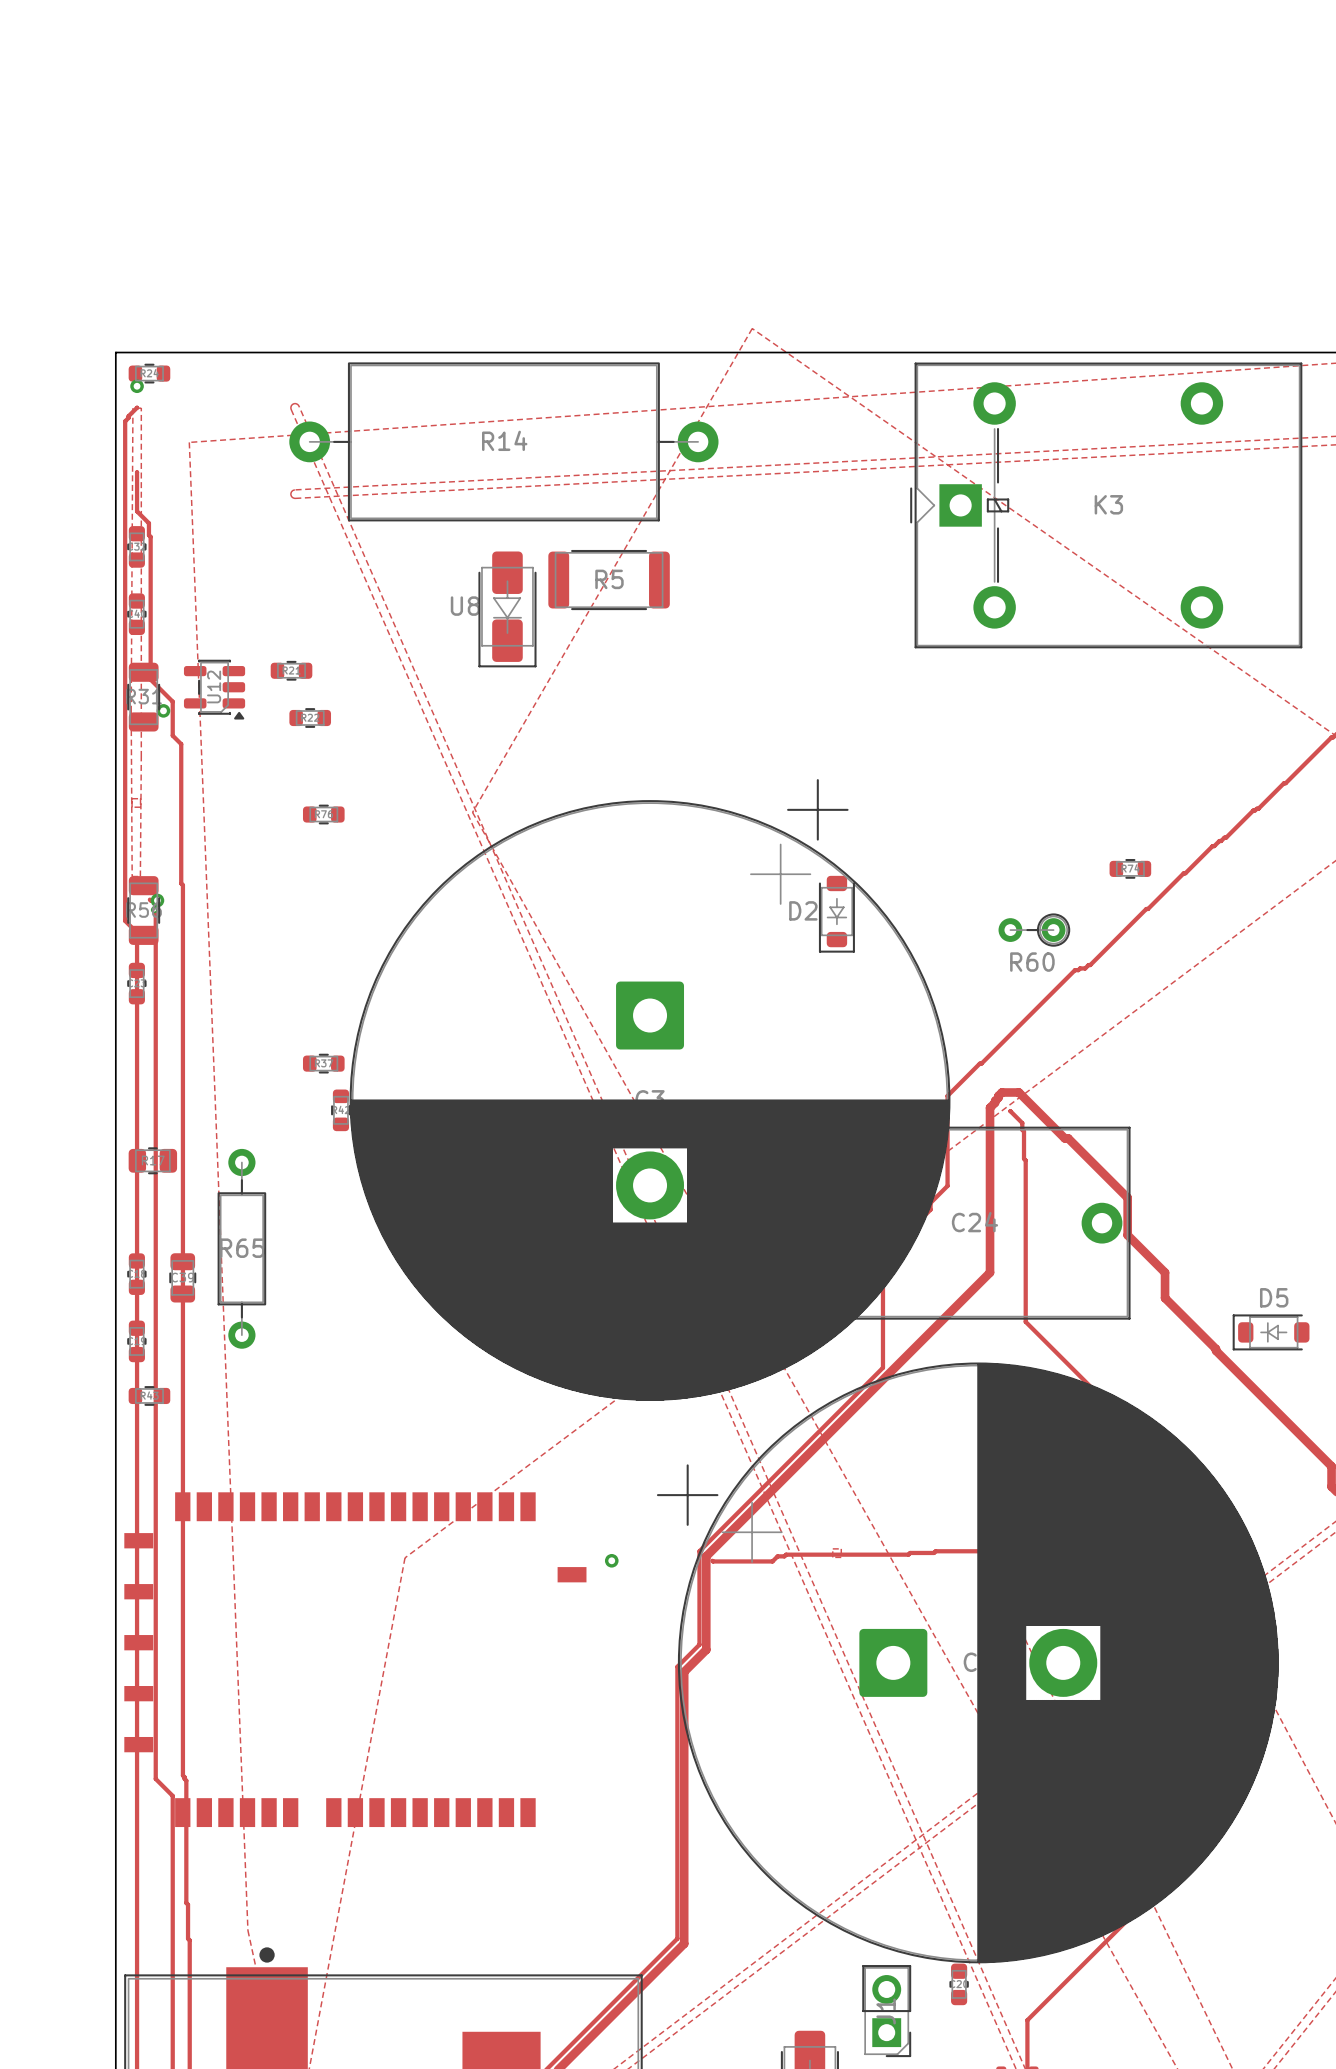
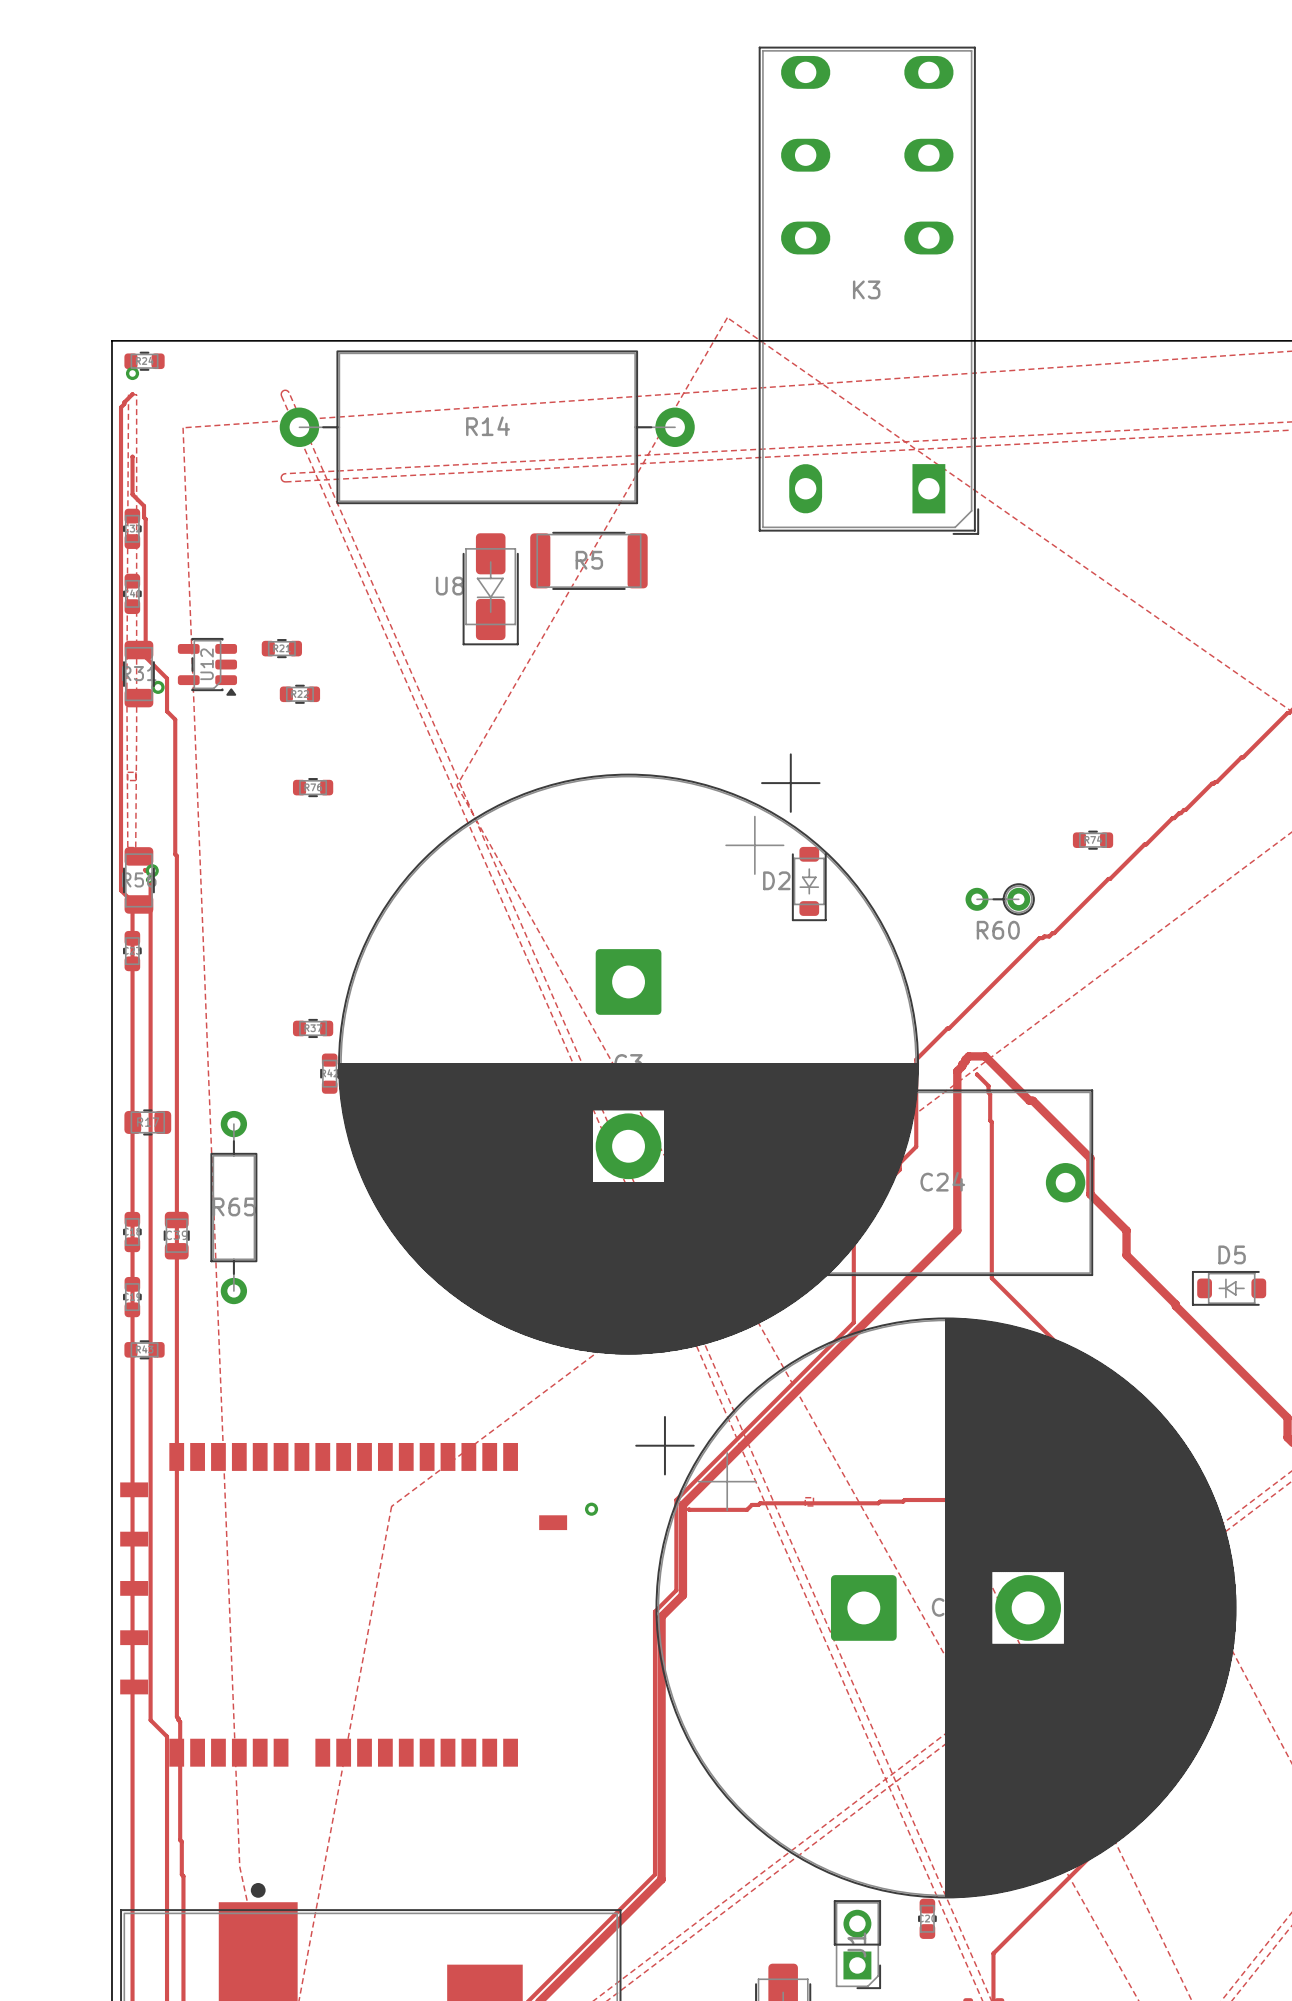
K3 footprint: [910, 362, 1303, 649] -> [758, 46, 980, 535]

